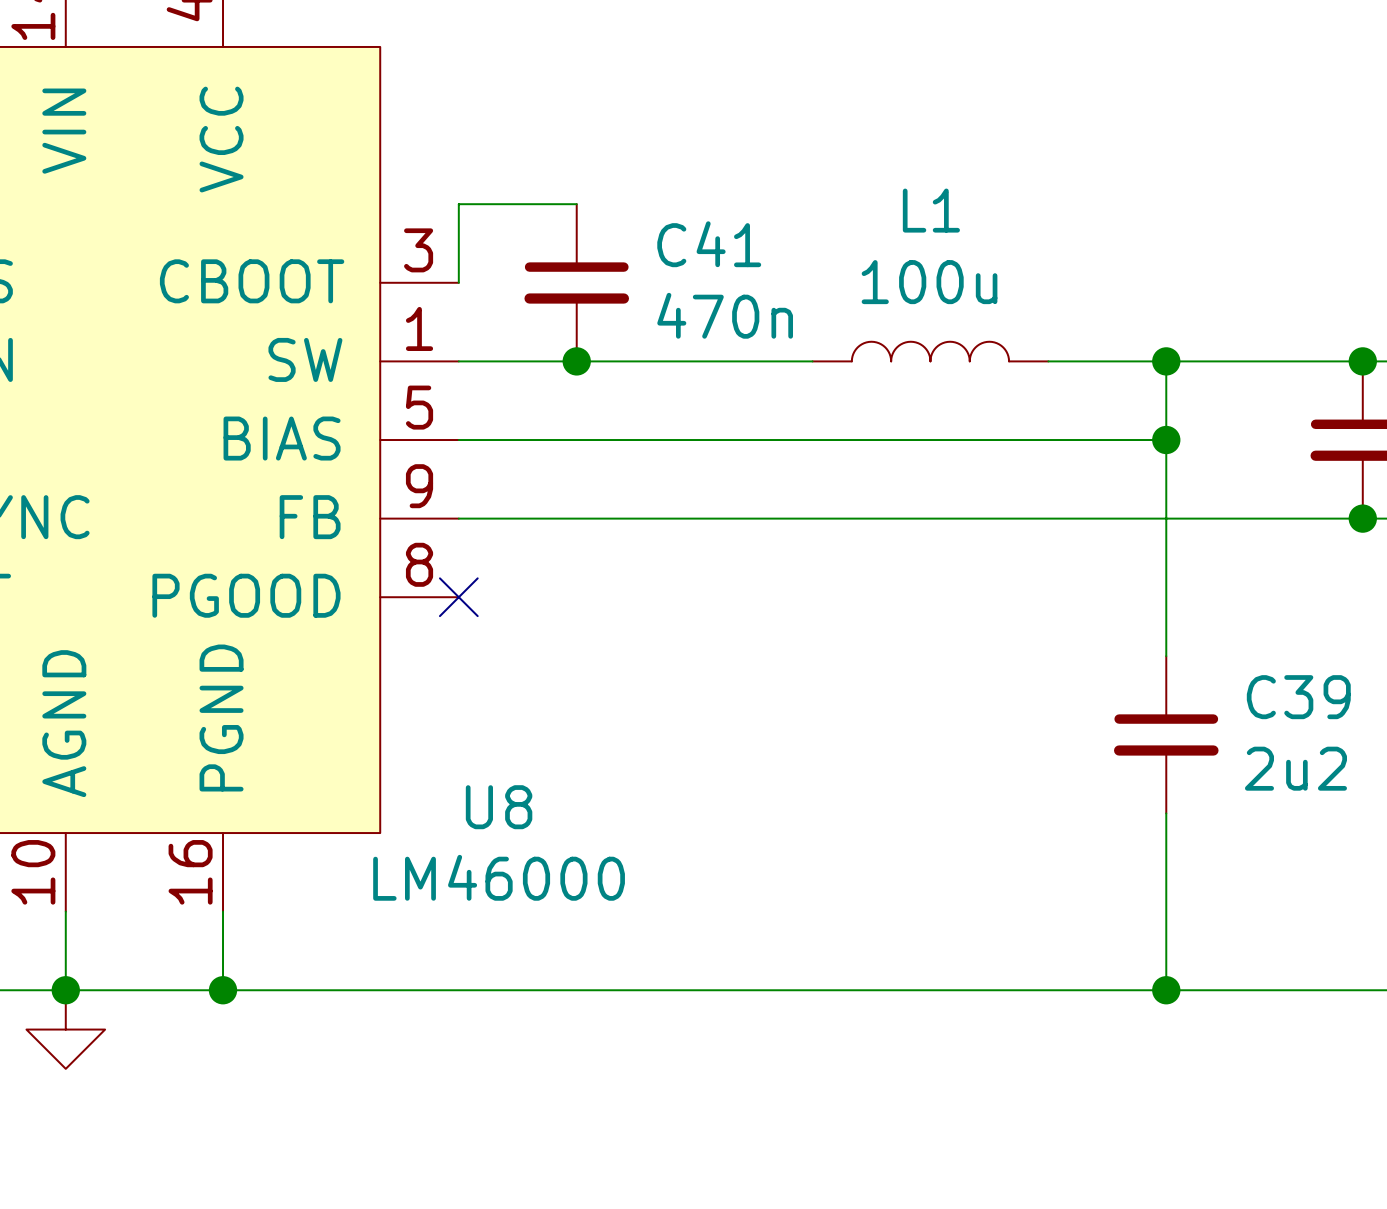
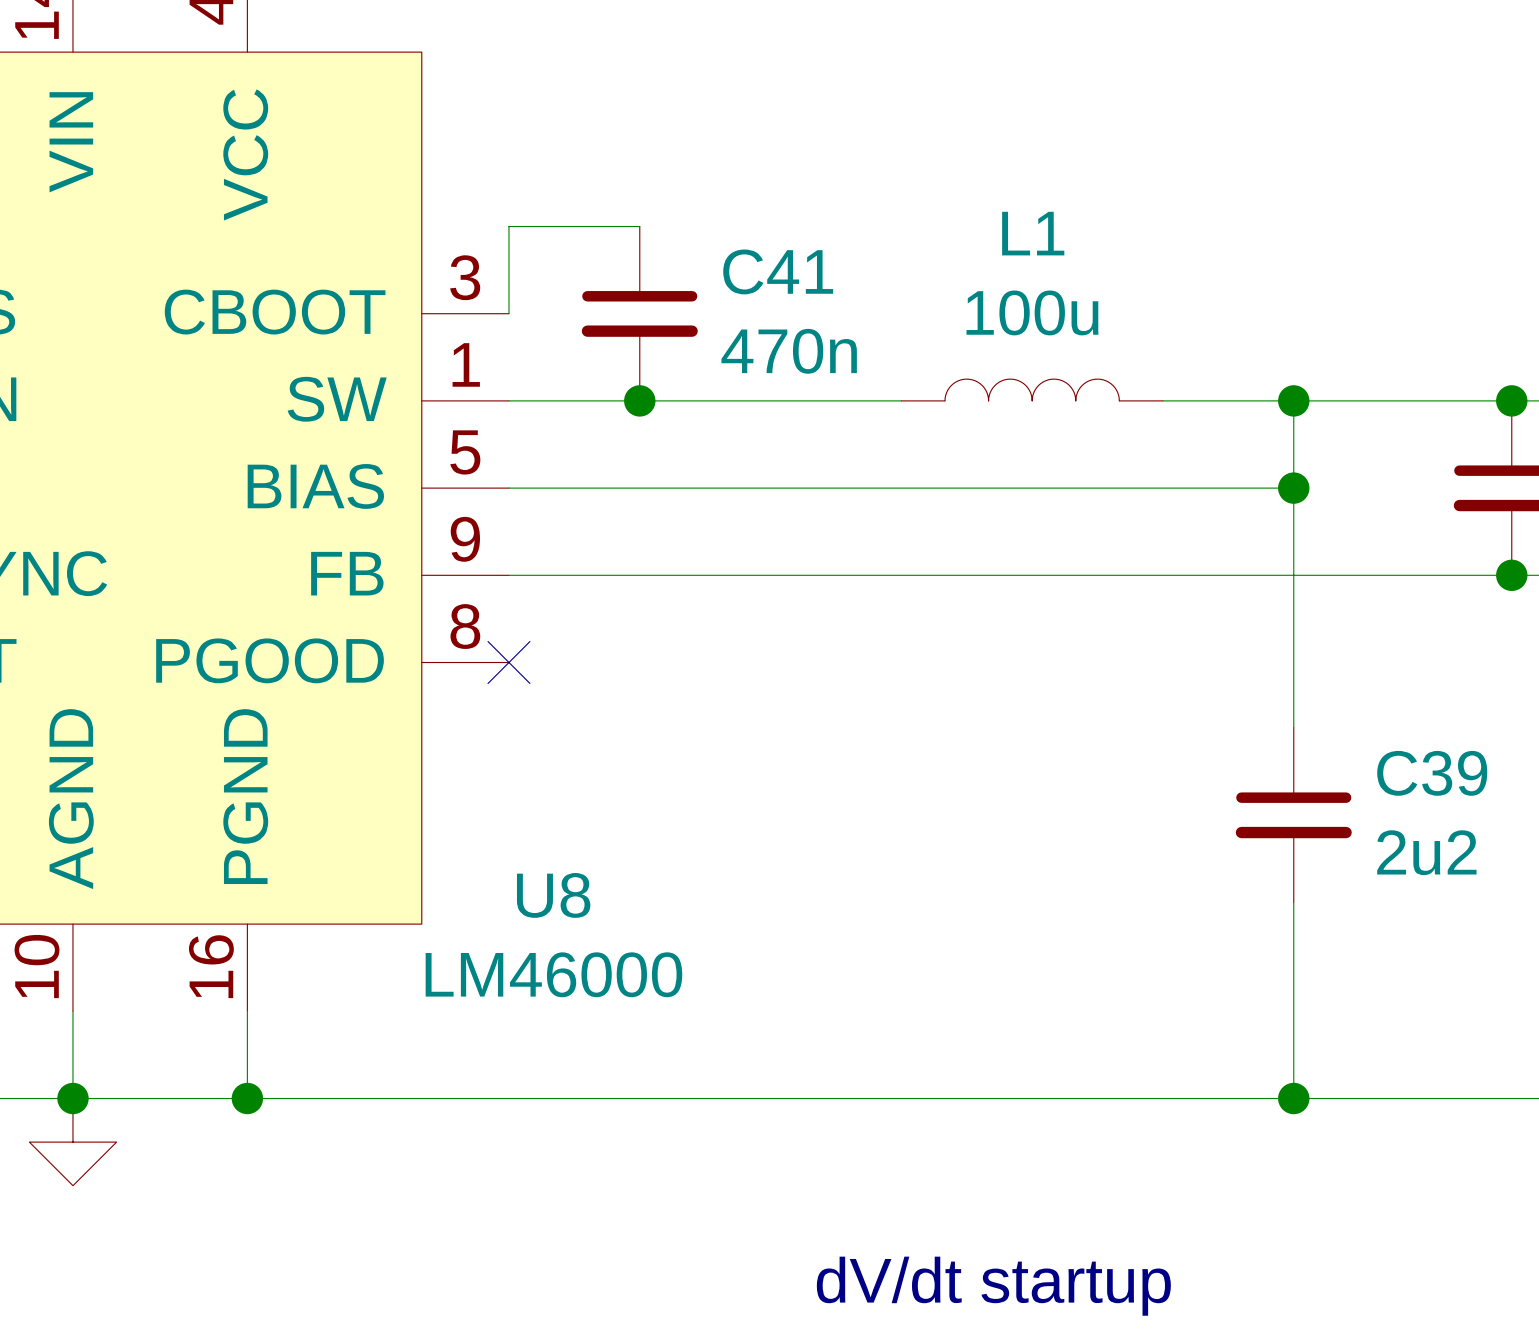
text: none -> dV/dt startup (993, 1286)

